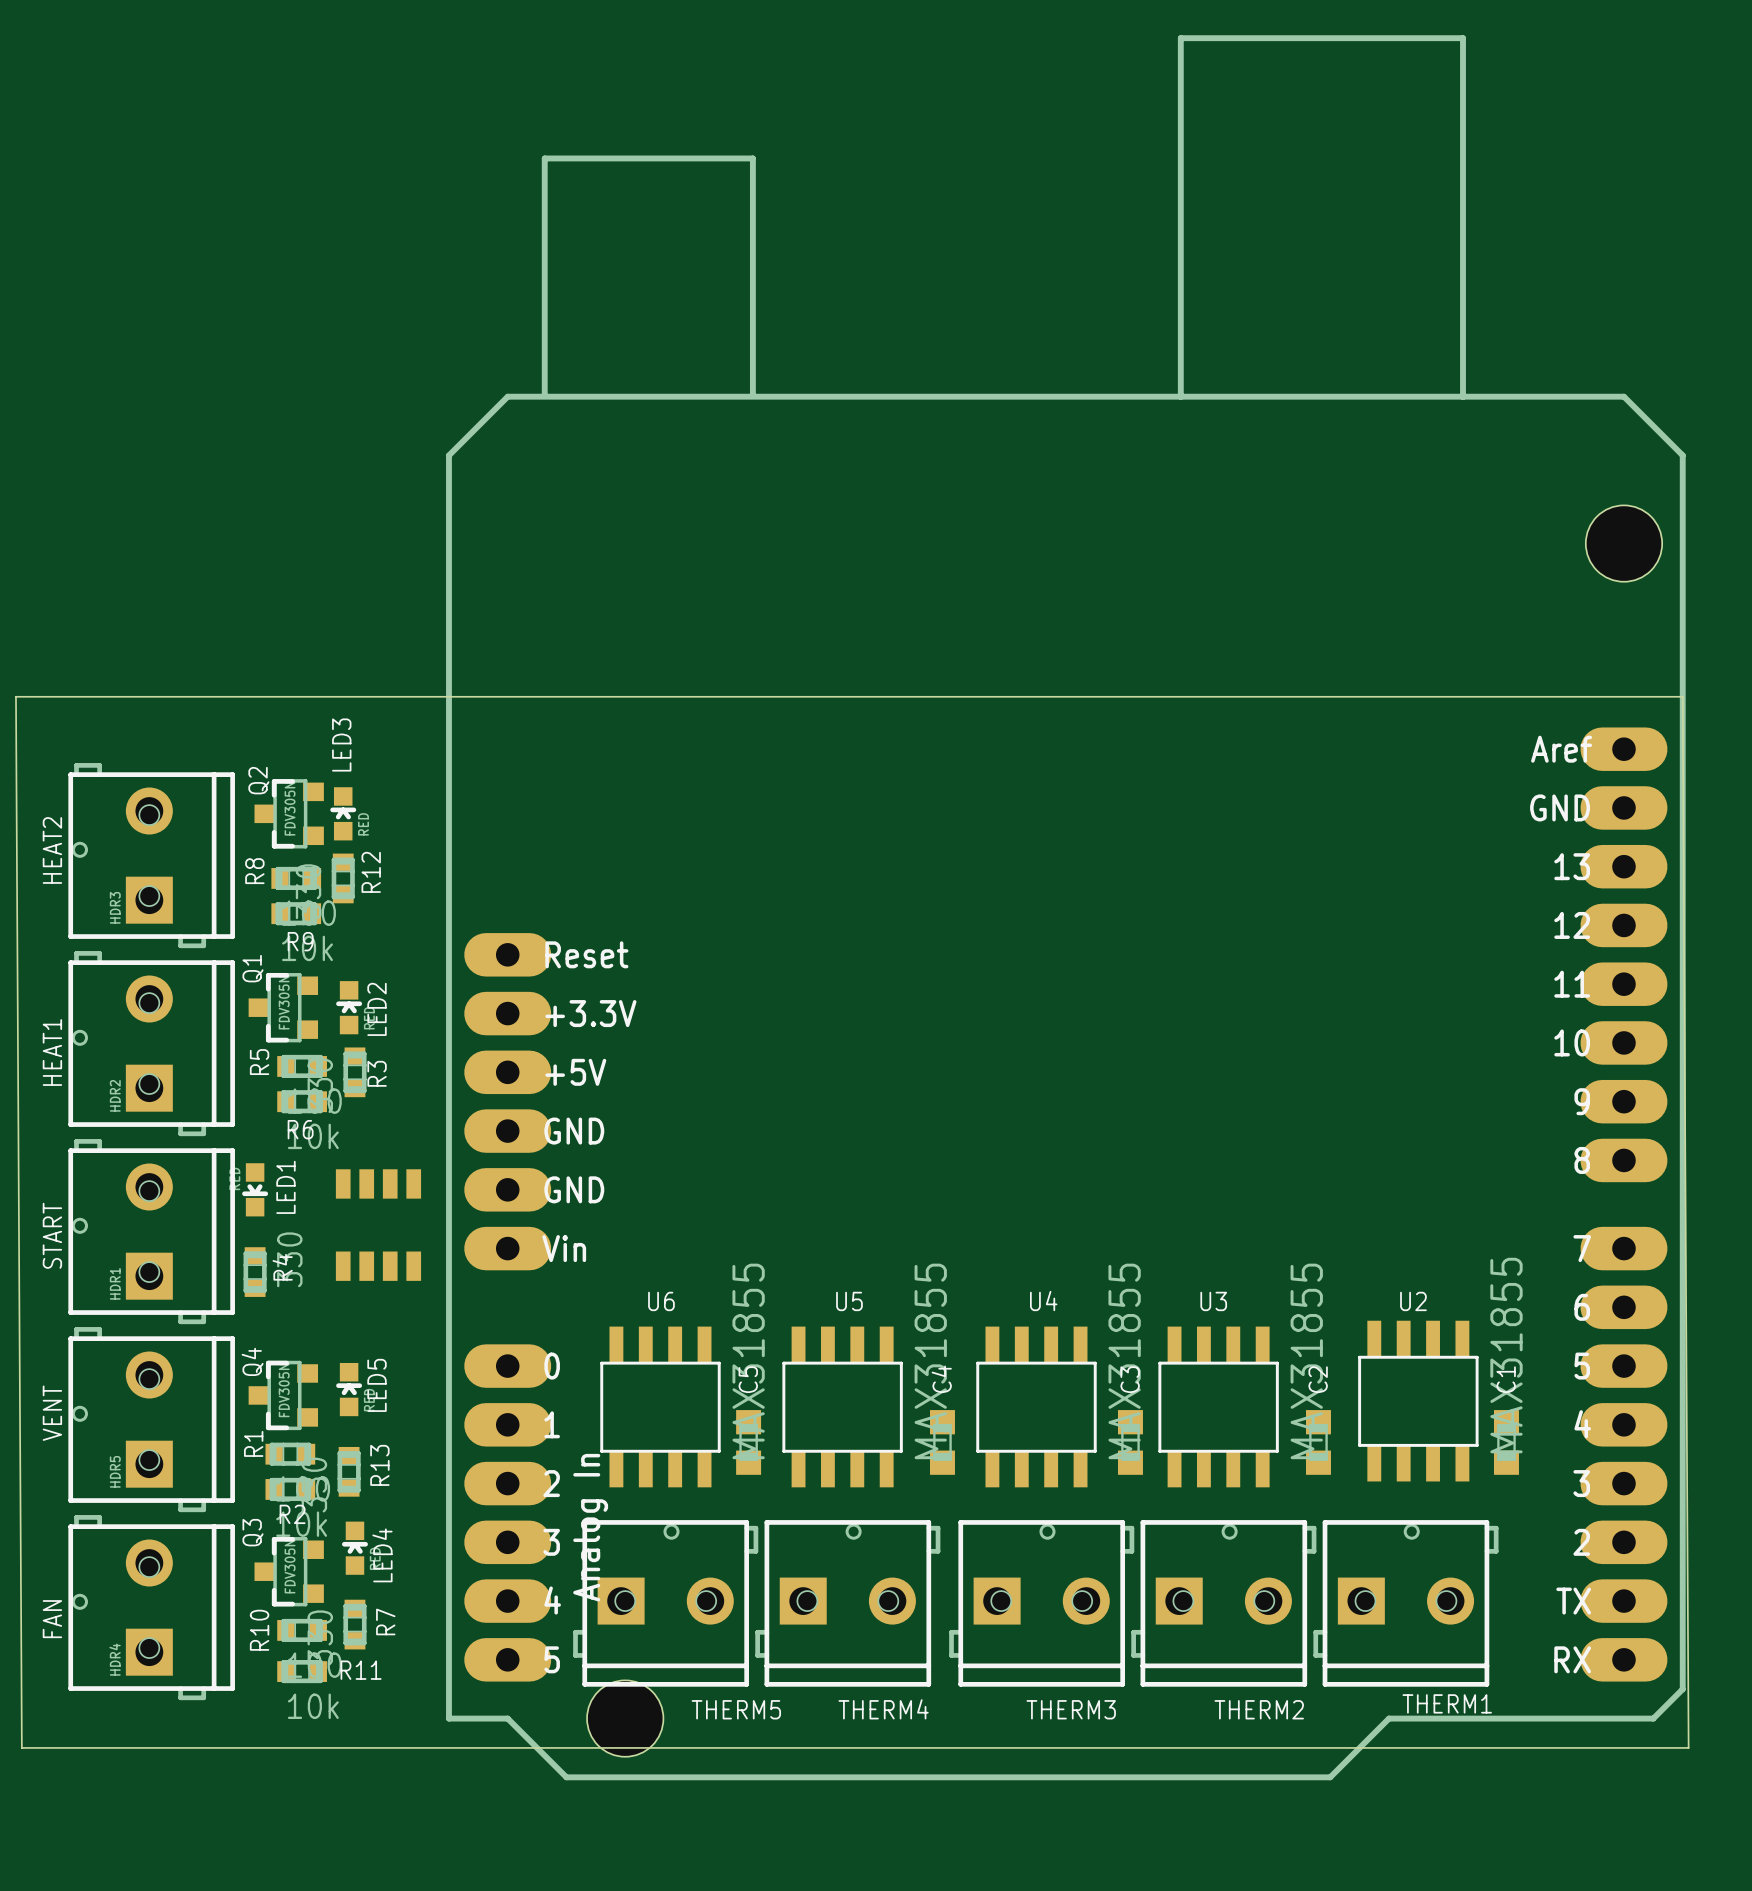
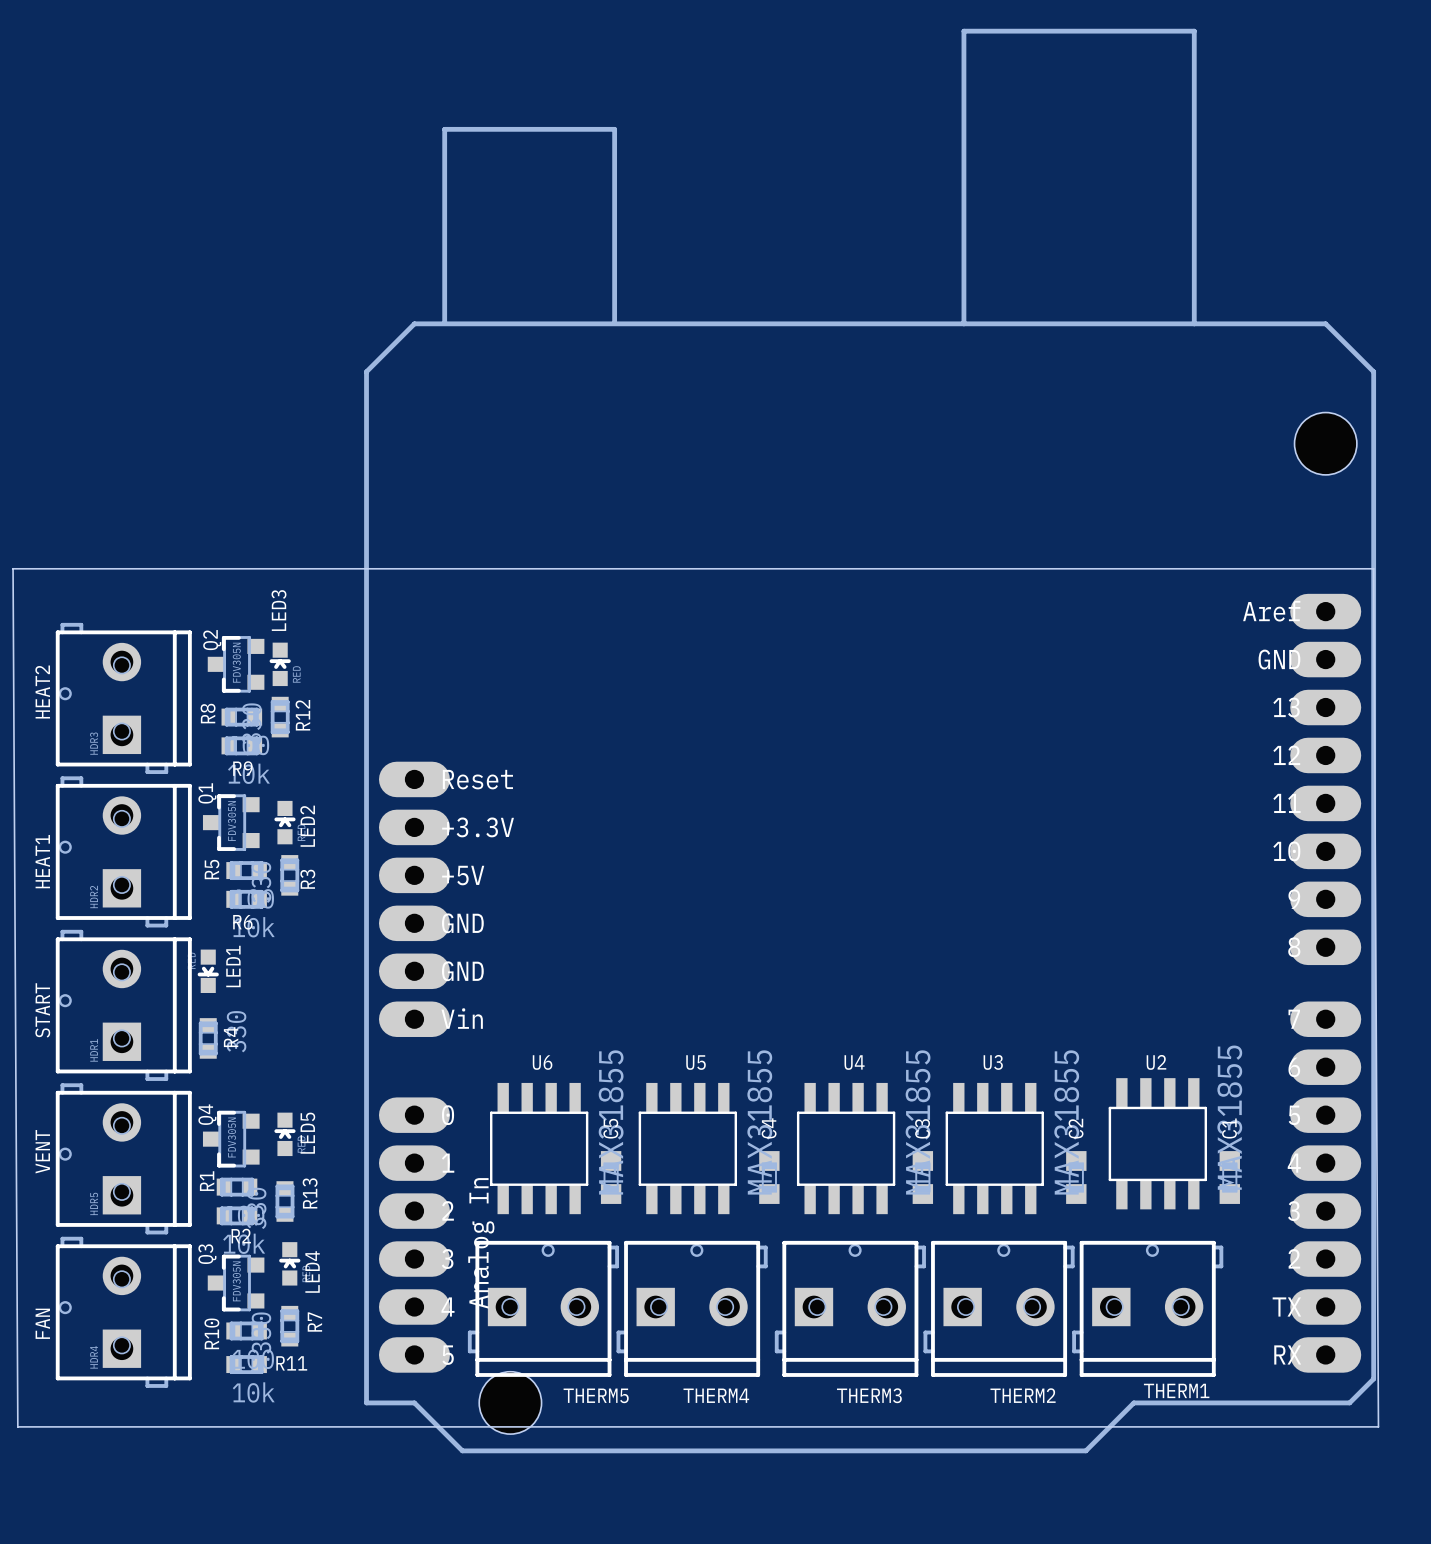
part: (378, 1225) -> none

